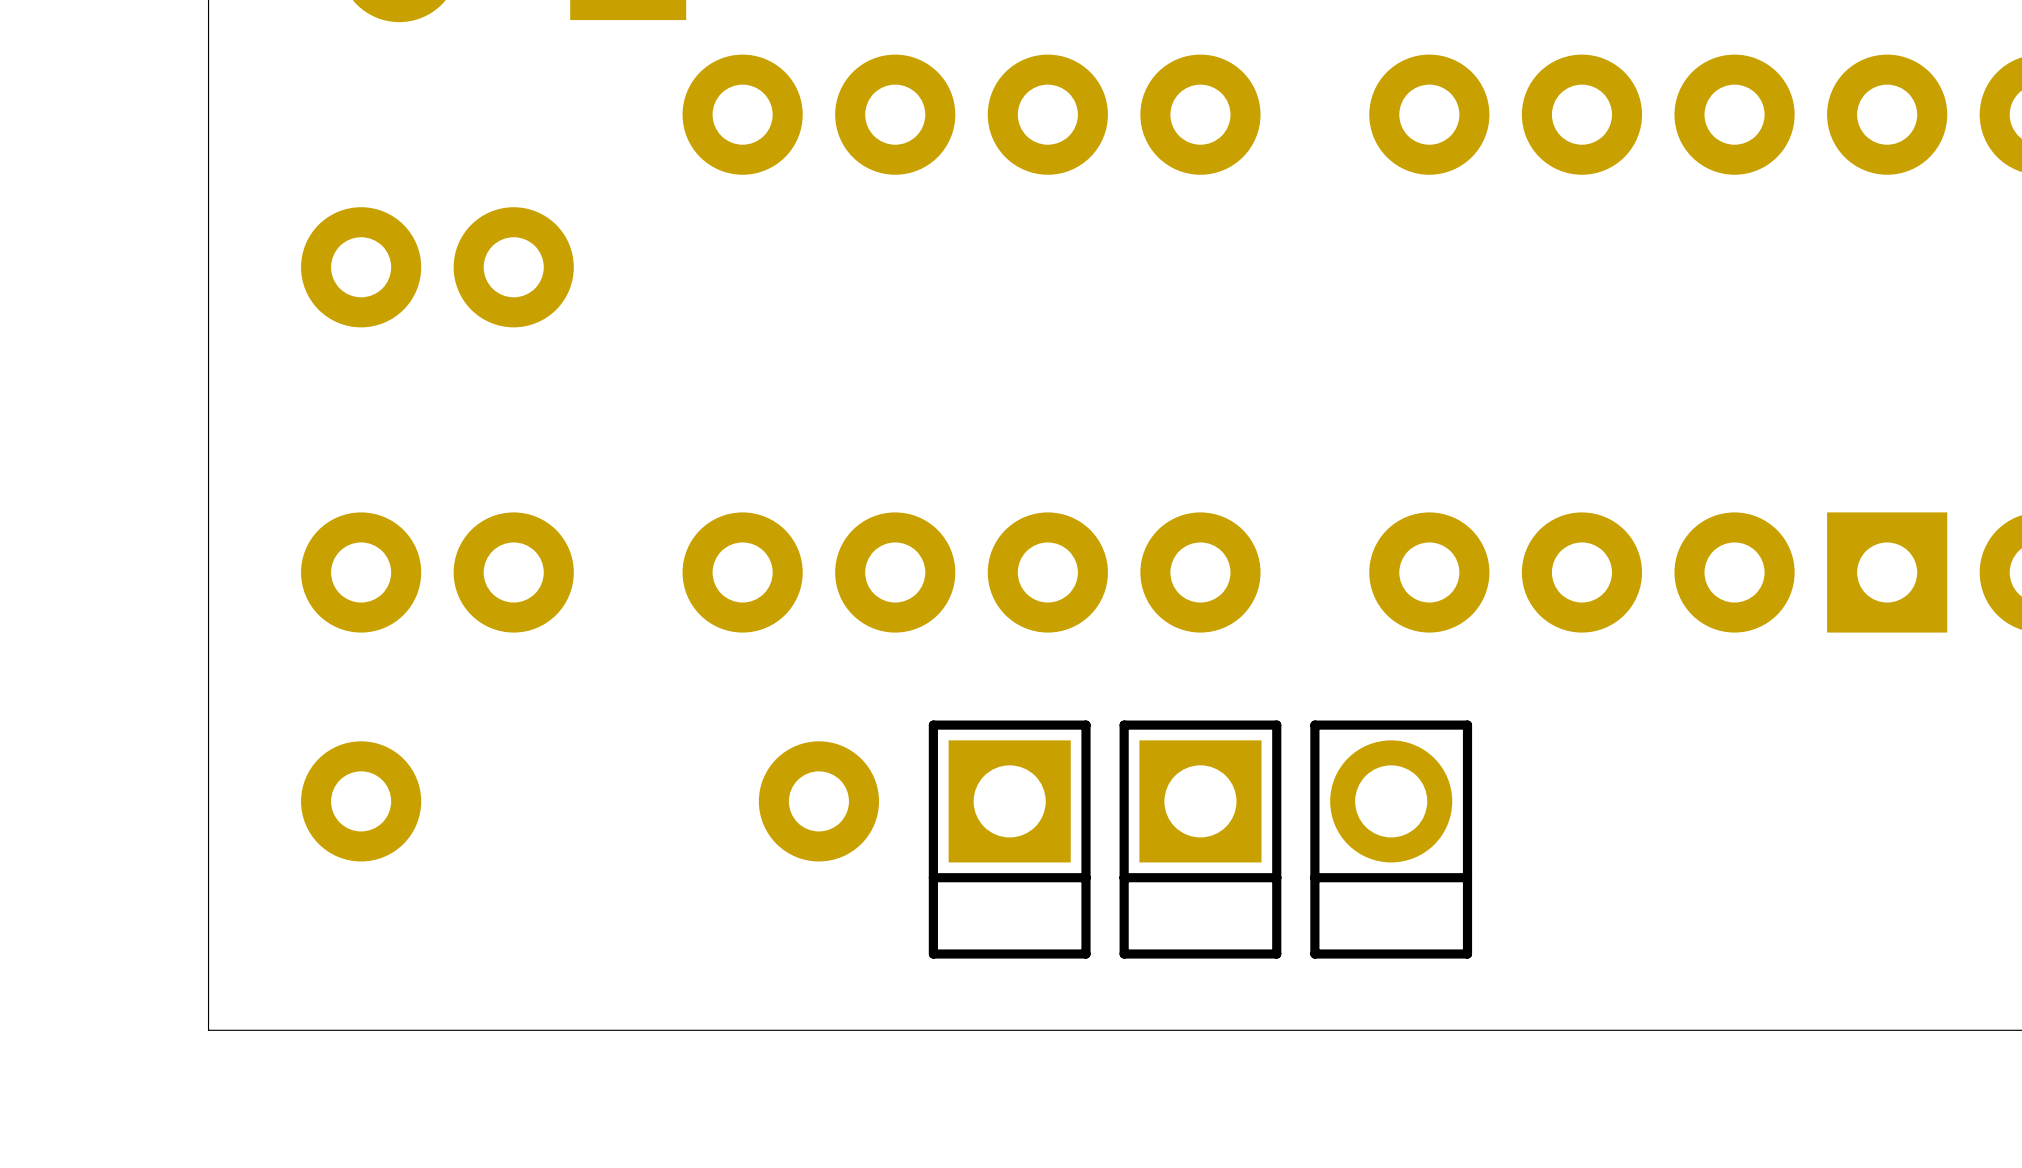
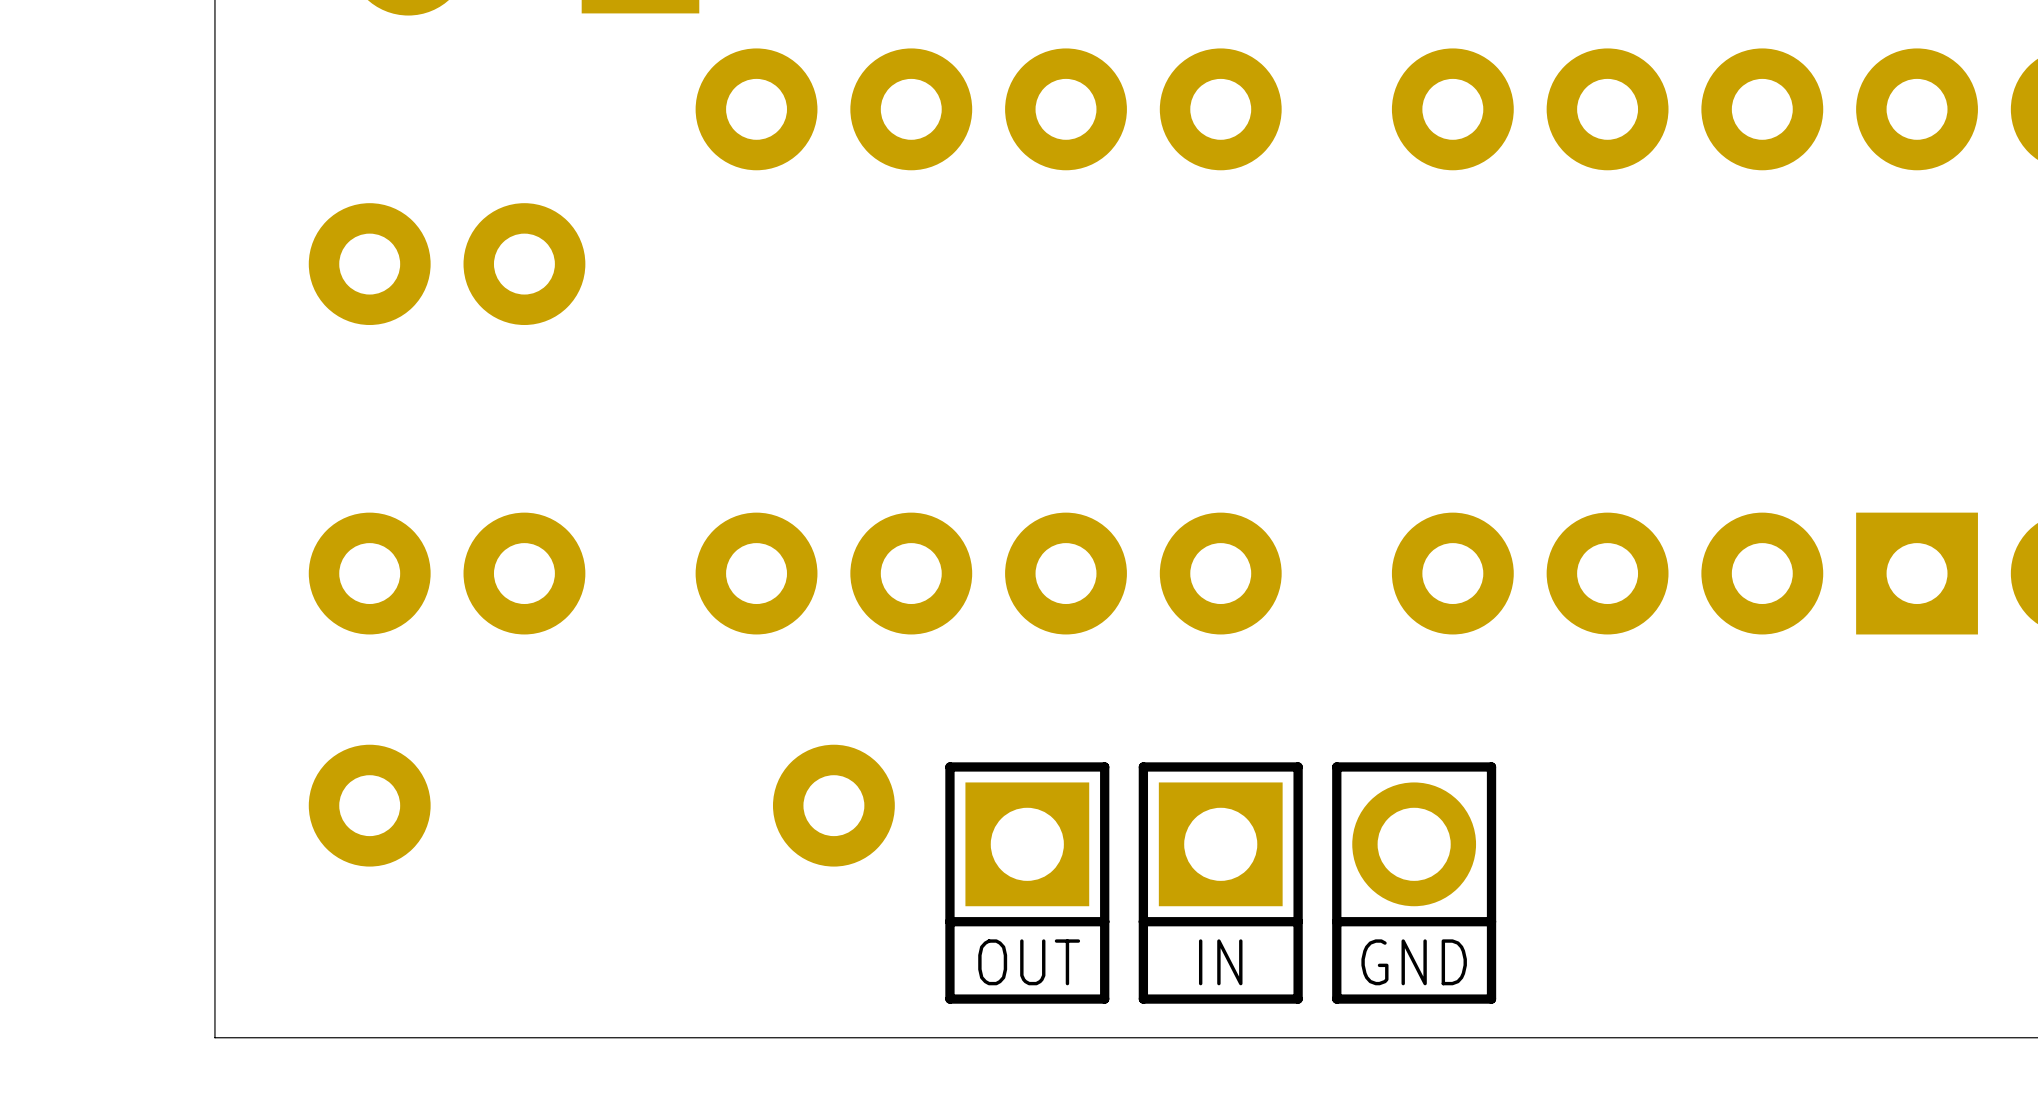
OUT position: (1009, 839) -> (1027, 883)
IN position: (1200, 839) -> (1220, 883)
GND position: (1391, 839) -> (1414, 883)
OUT name: none -> OUT (1029, 962)
IN name: none -> IN (1220, 962)
GND name: none -> GND (1414, 962)

